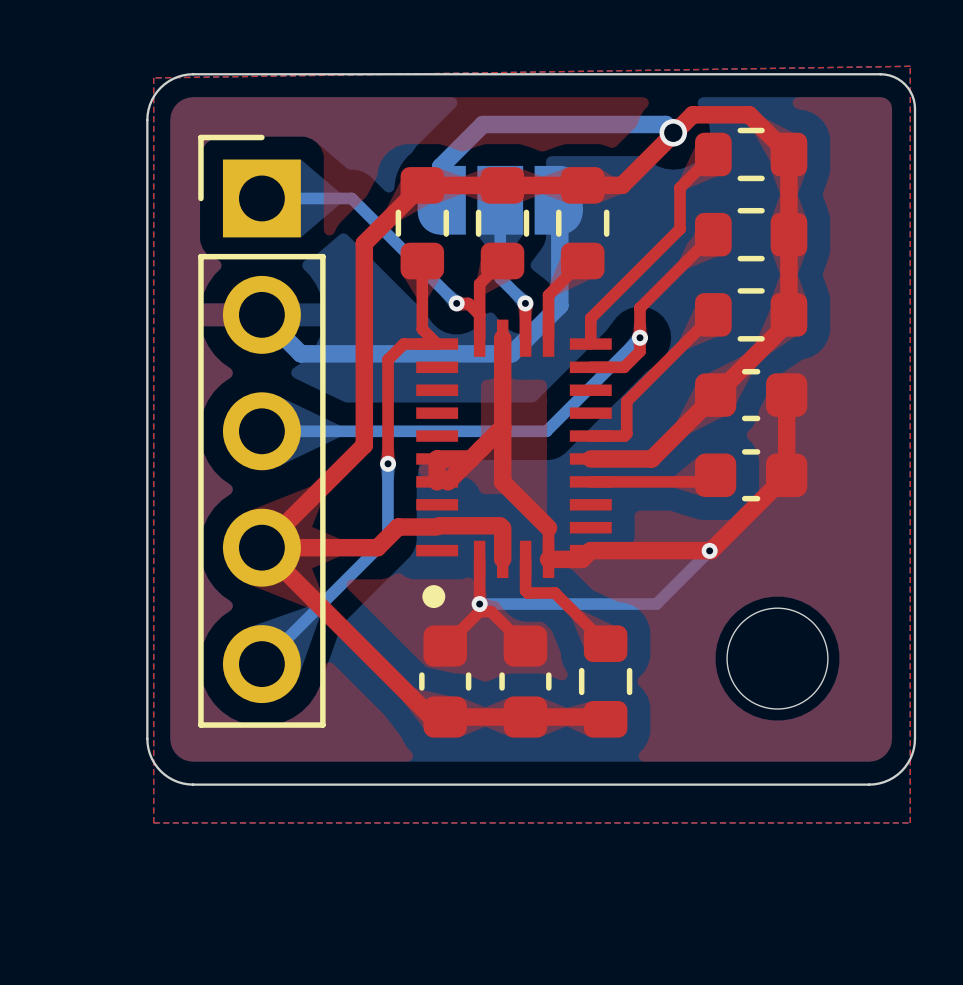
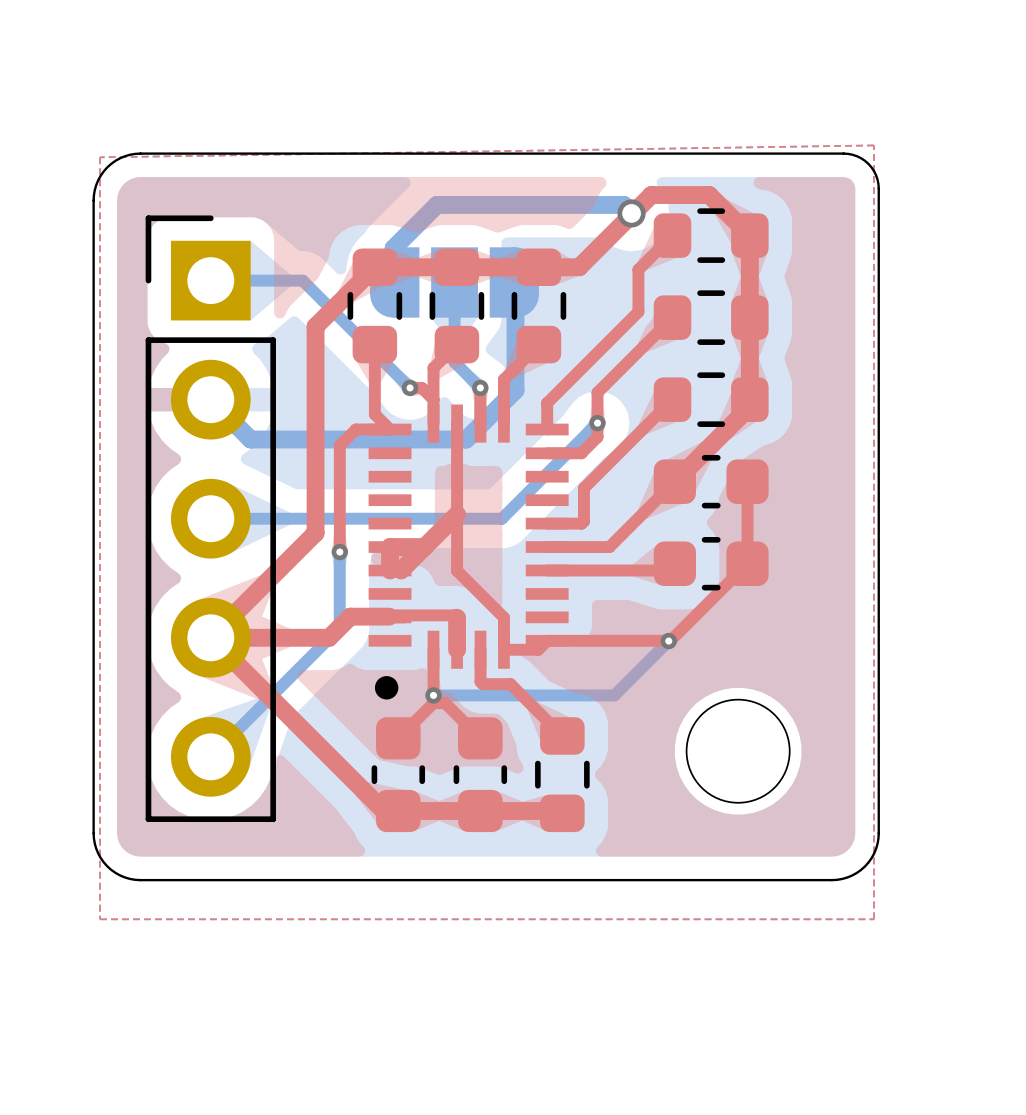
top track width: thick (502, 338) (502, 482) (548, 527) -> thin (457, 423) (457, 570) (503, 617)
top track width: thick (715, 395) (651, 458) (590, 458) -> thin (674, 481) (609, 547) (547, 547)
top track width: thick (786, 395) (786, 475) (711, 550) (590, 550) (582, 559) (548, 559) -> thin (747, 481) (747, 563) (670, 640) (547, 640) (538, 649) (503, 649)
top track width: thick (439, 525) (500, 525) -> thin (392, 615) (454, 615)

